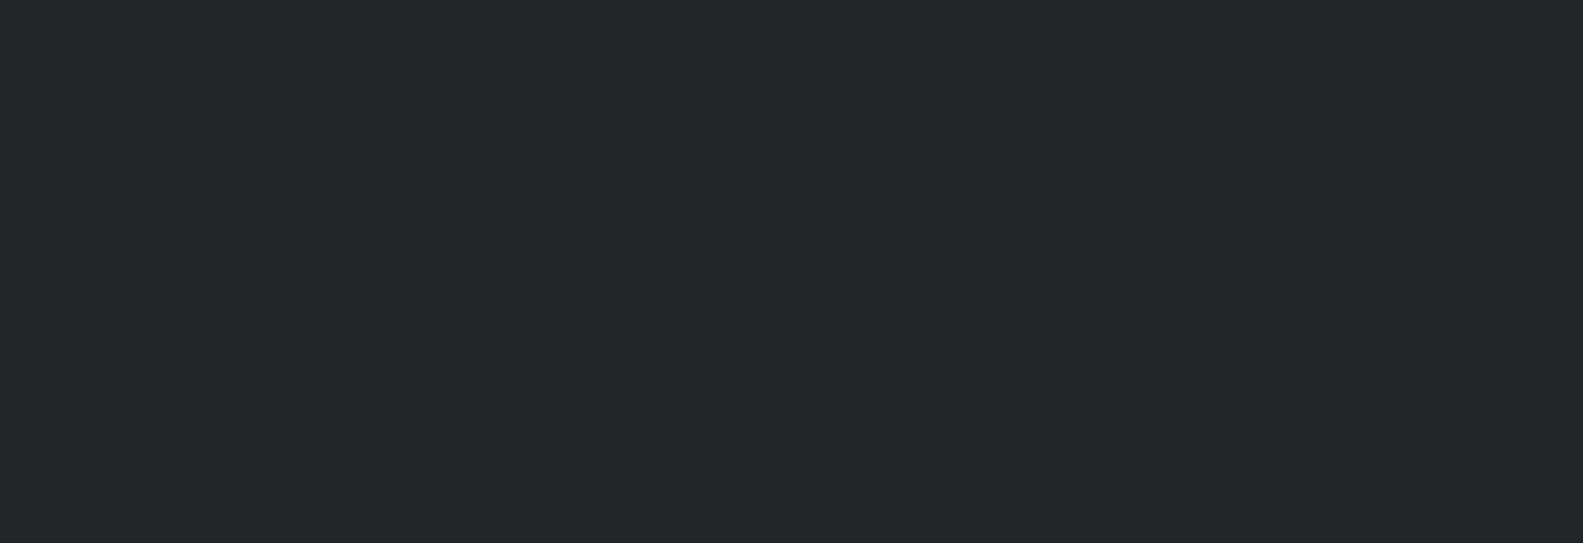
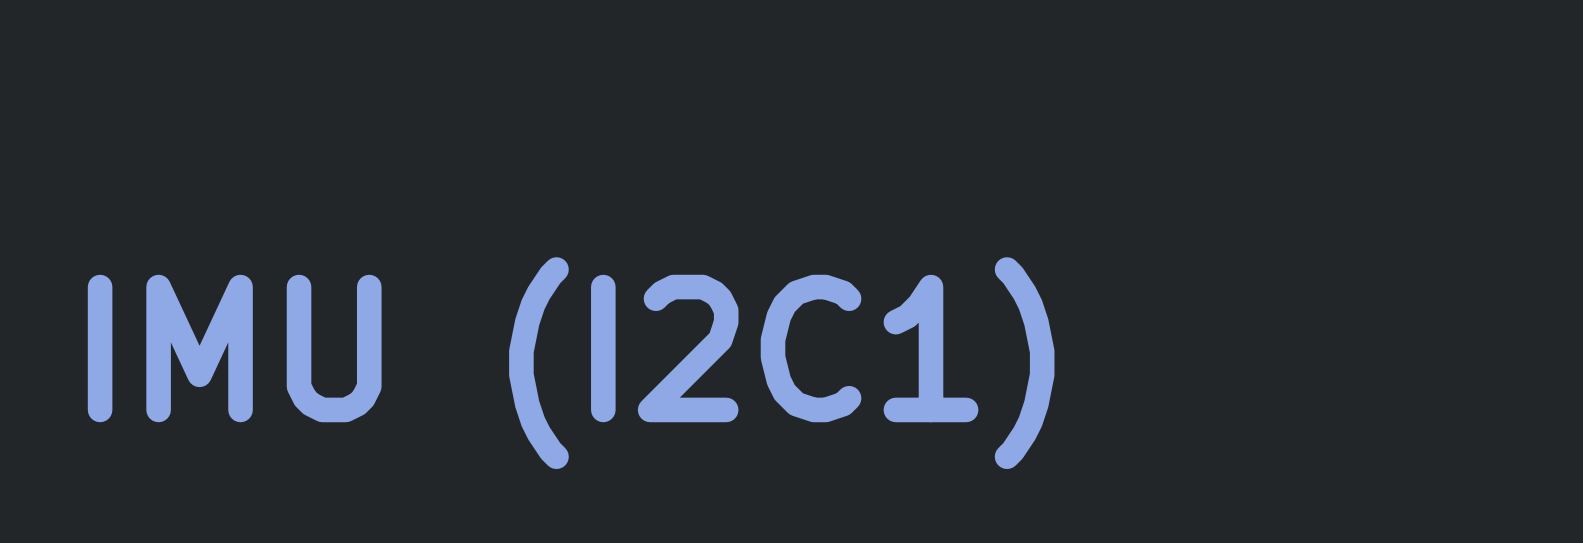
text: none -> IMU (I2C1) (571, 363)

